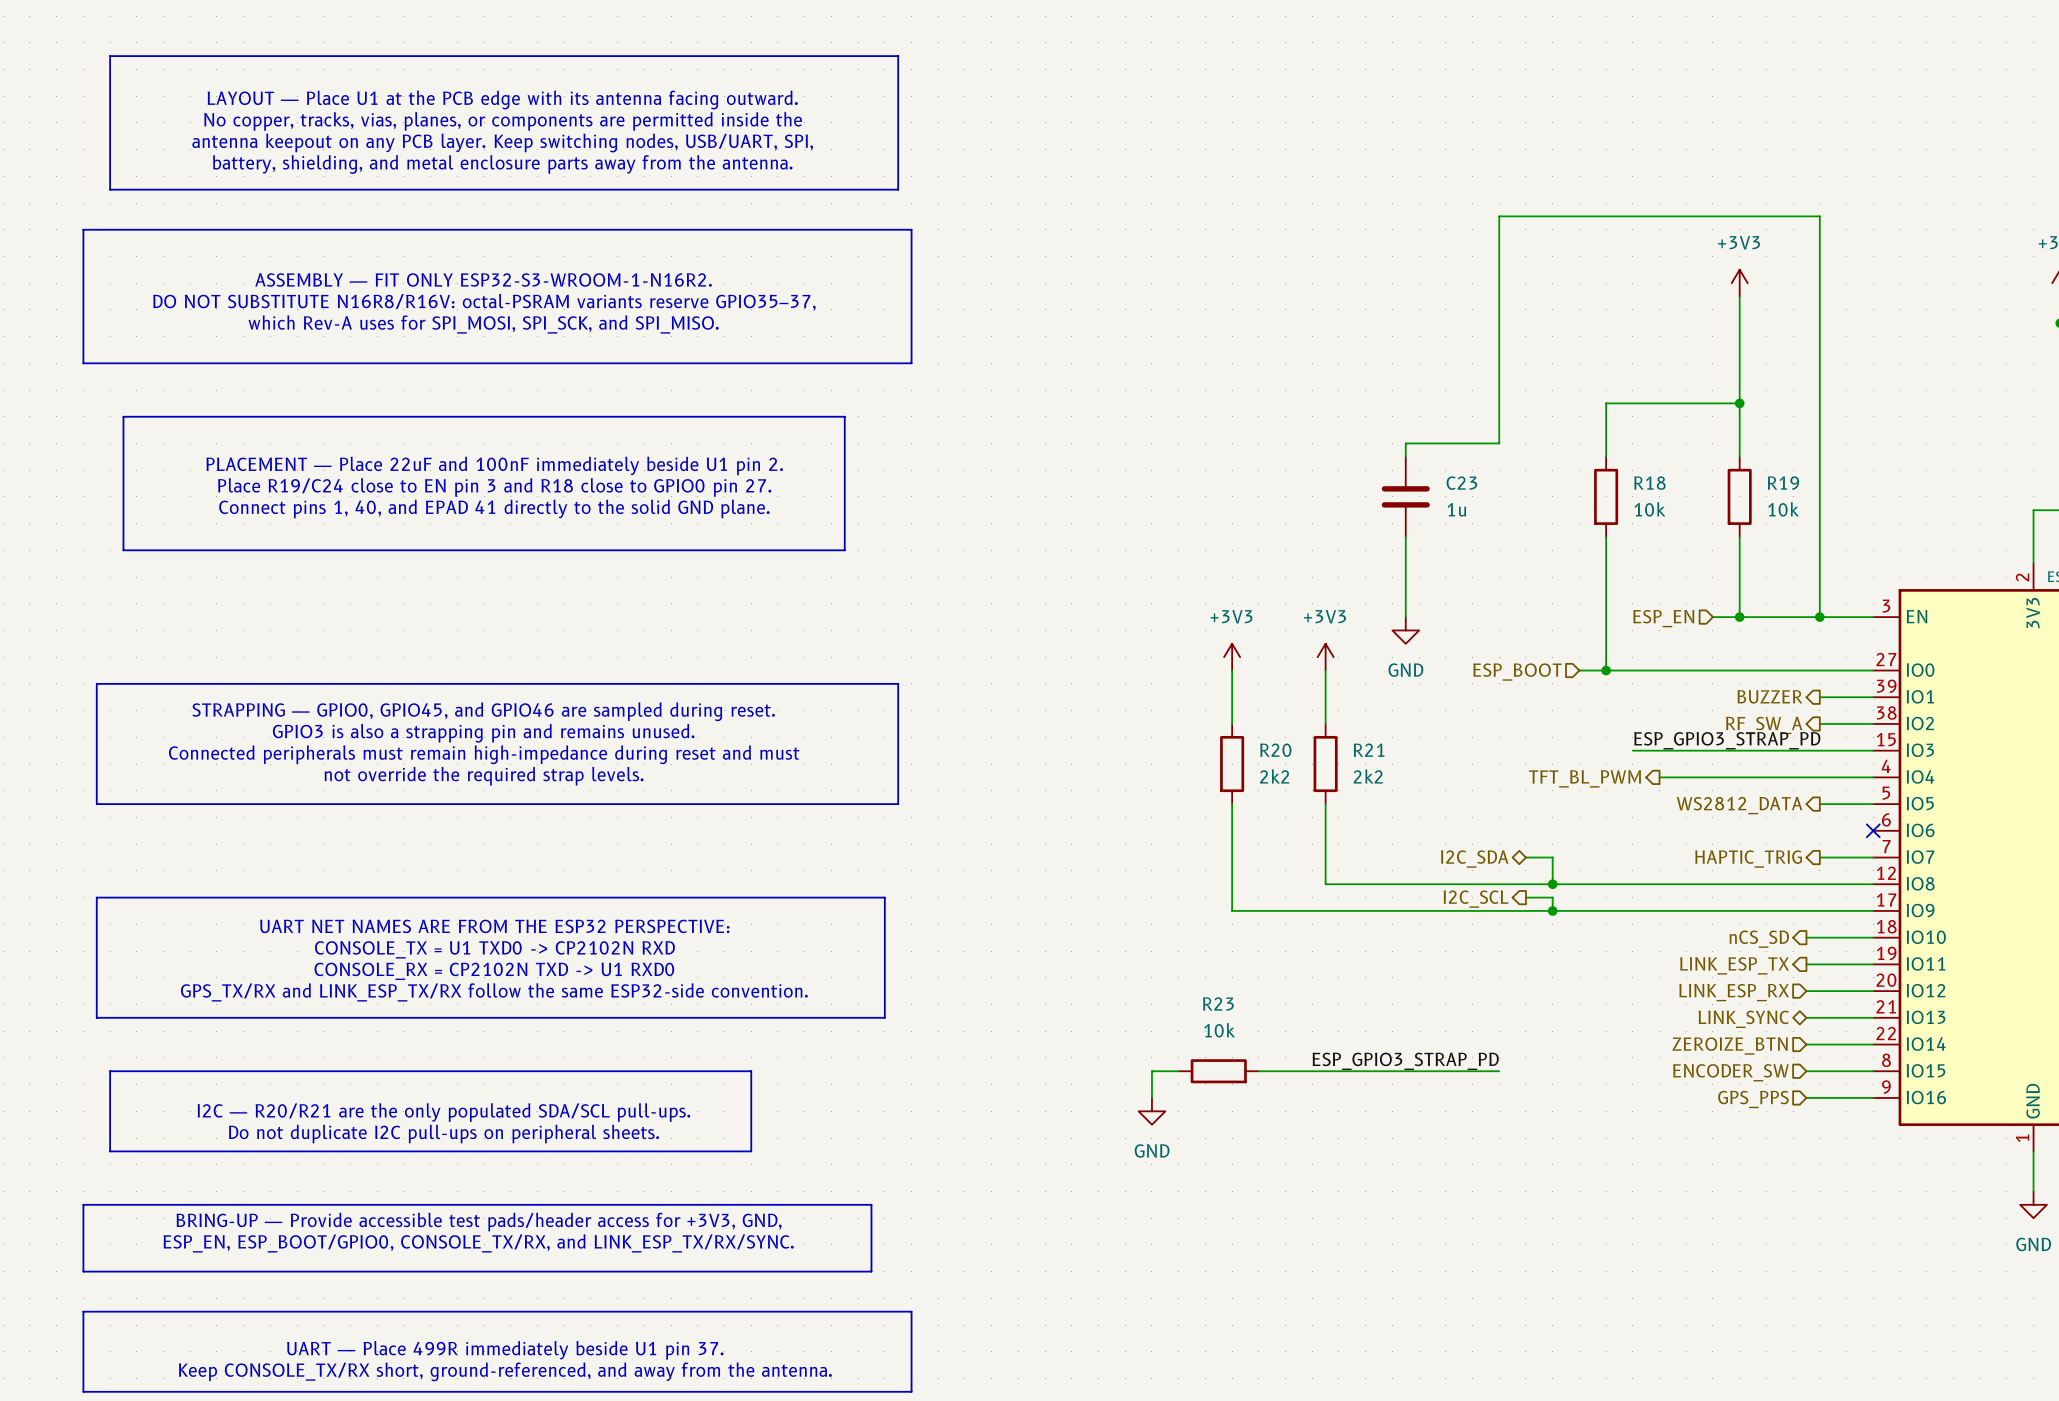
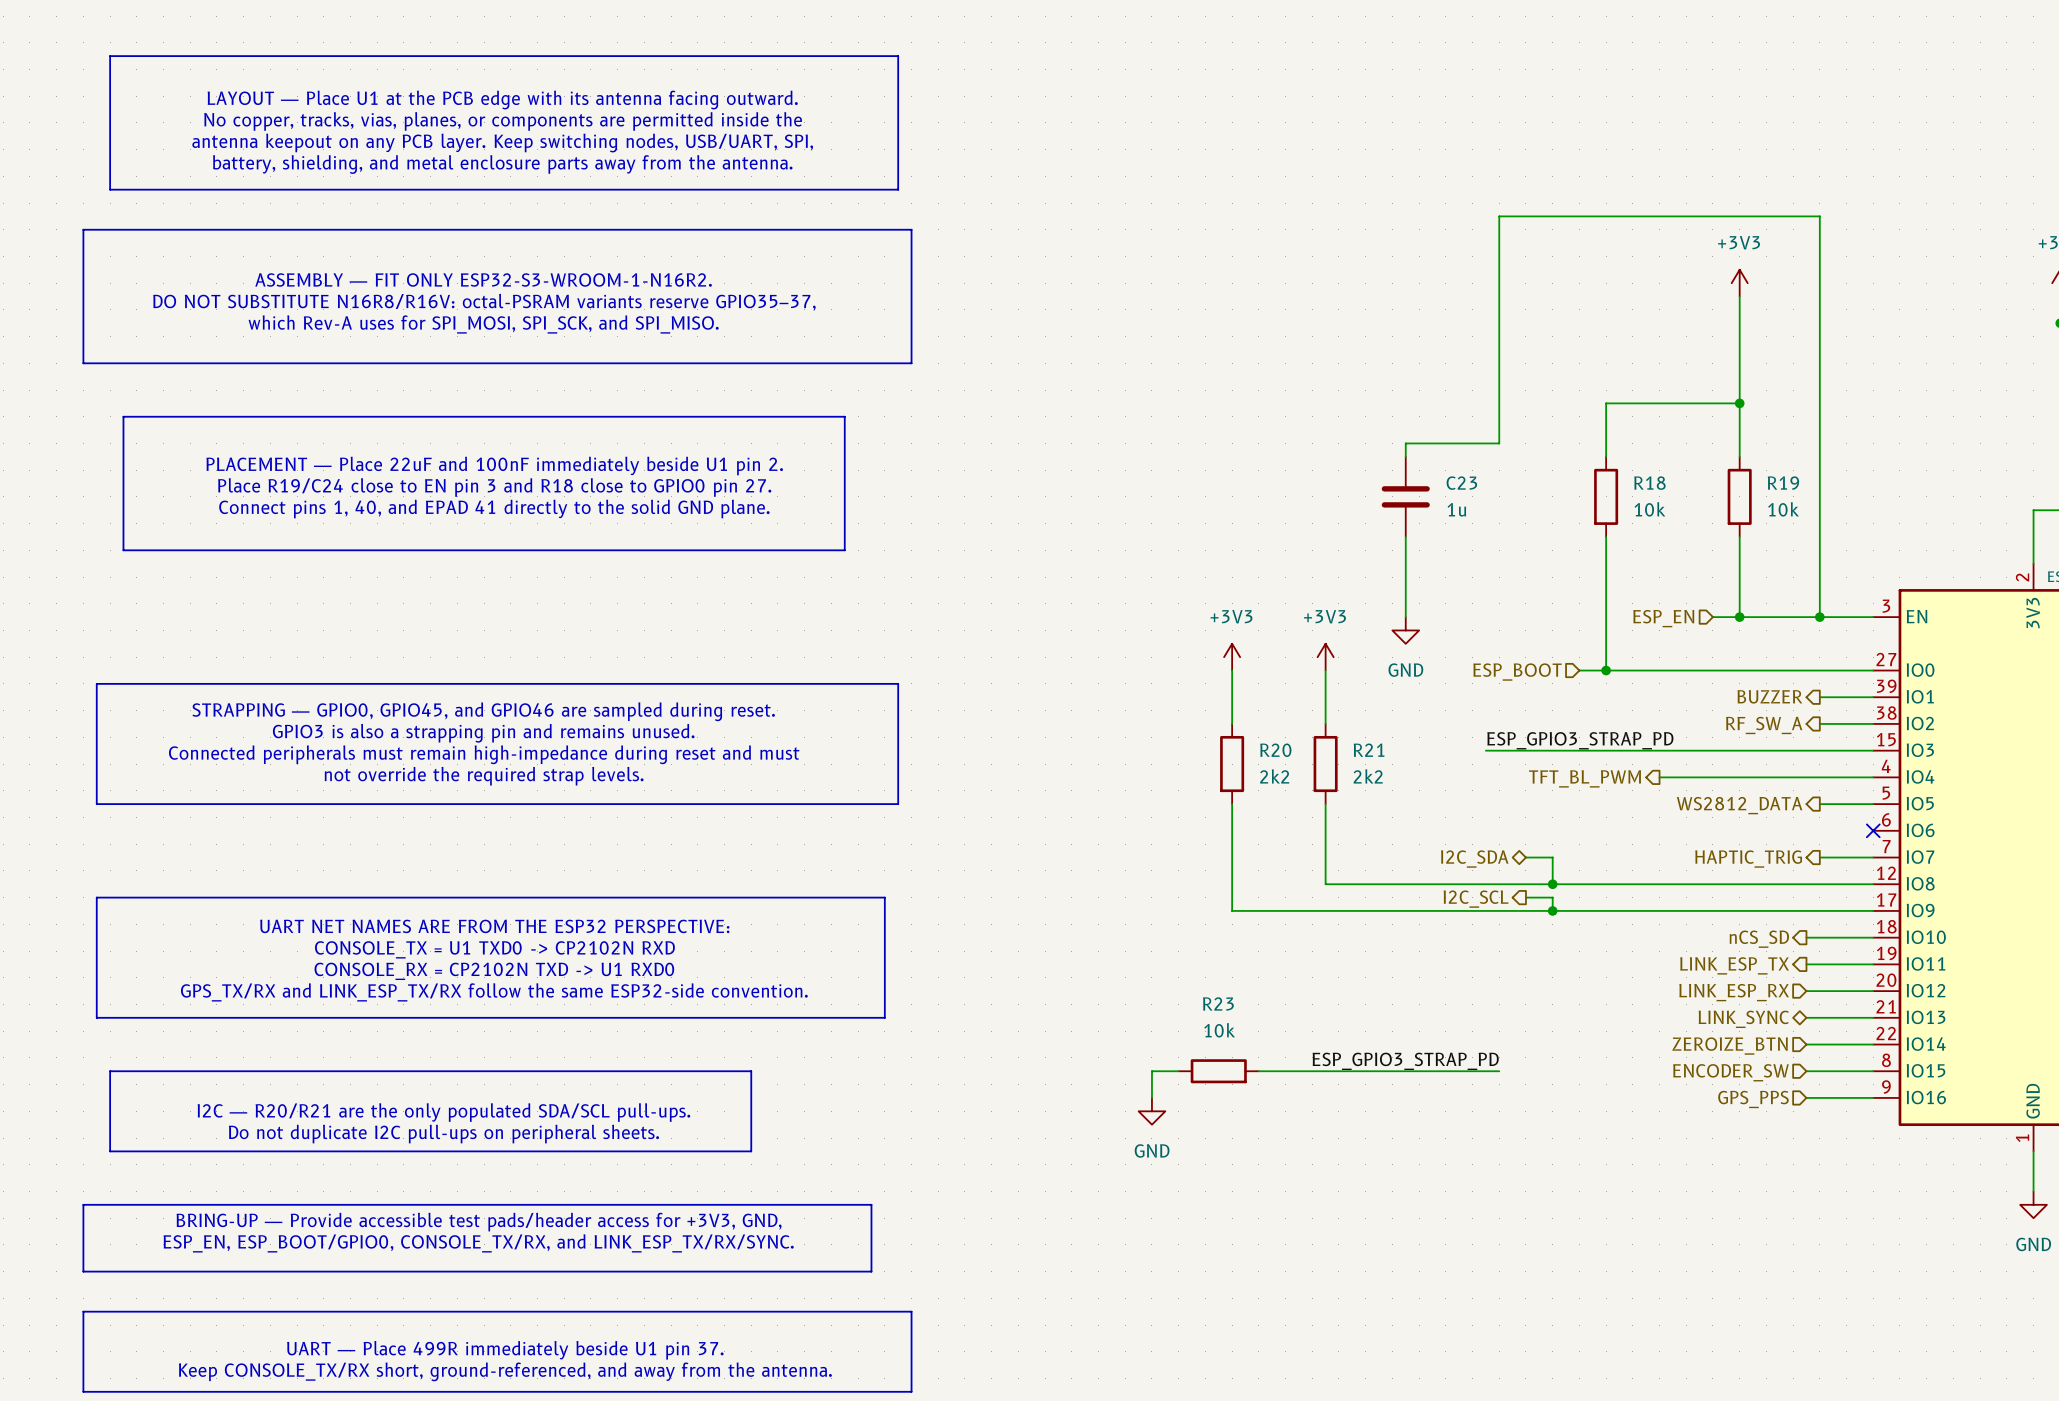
label position: ESP_GPIO3_STRAP_PD (1727, 740) -> ESP_GPIO3_STRAP_PD (1580, 740)
wire: none -> (1485, 750) (1632, 750)

